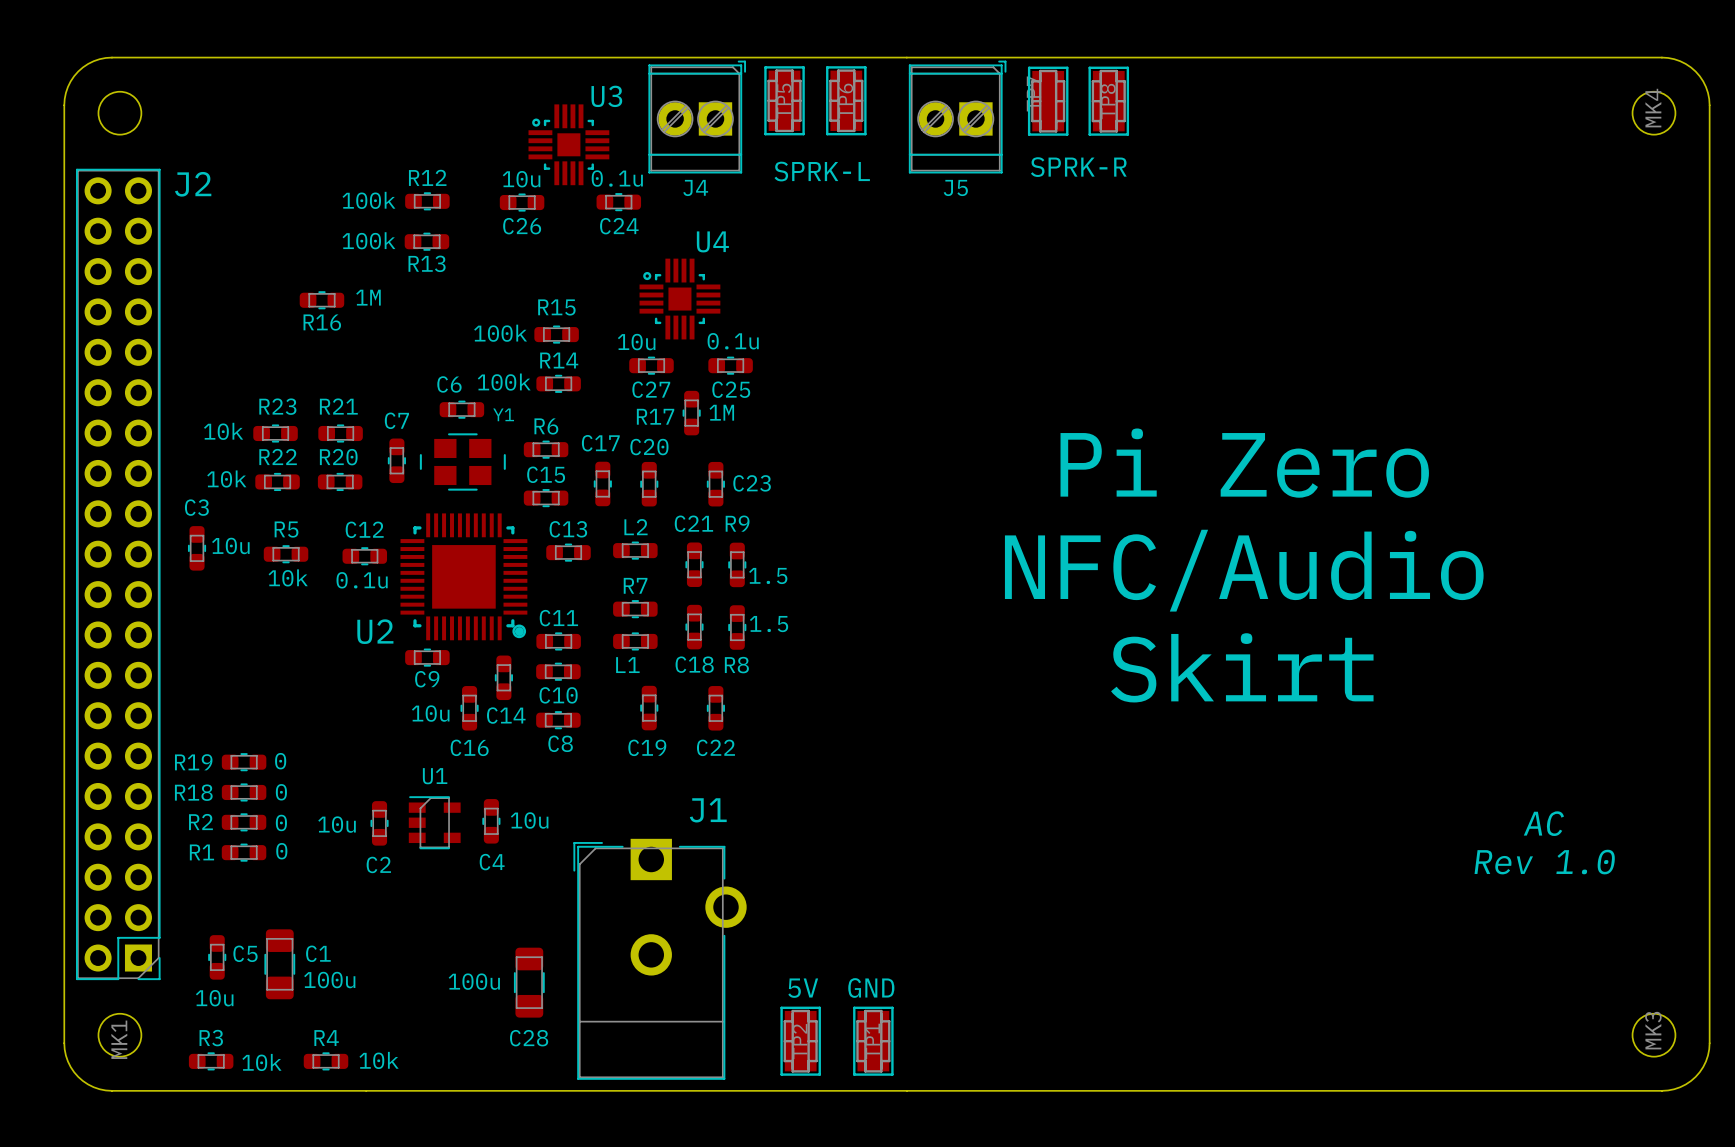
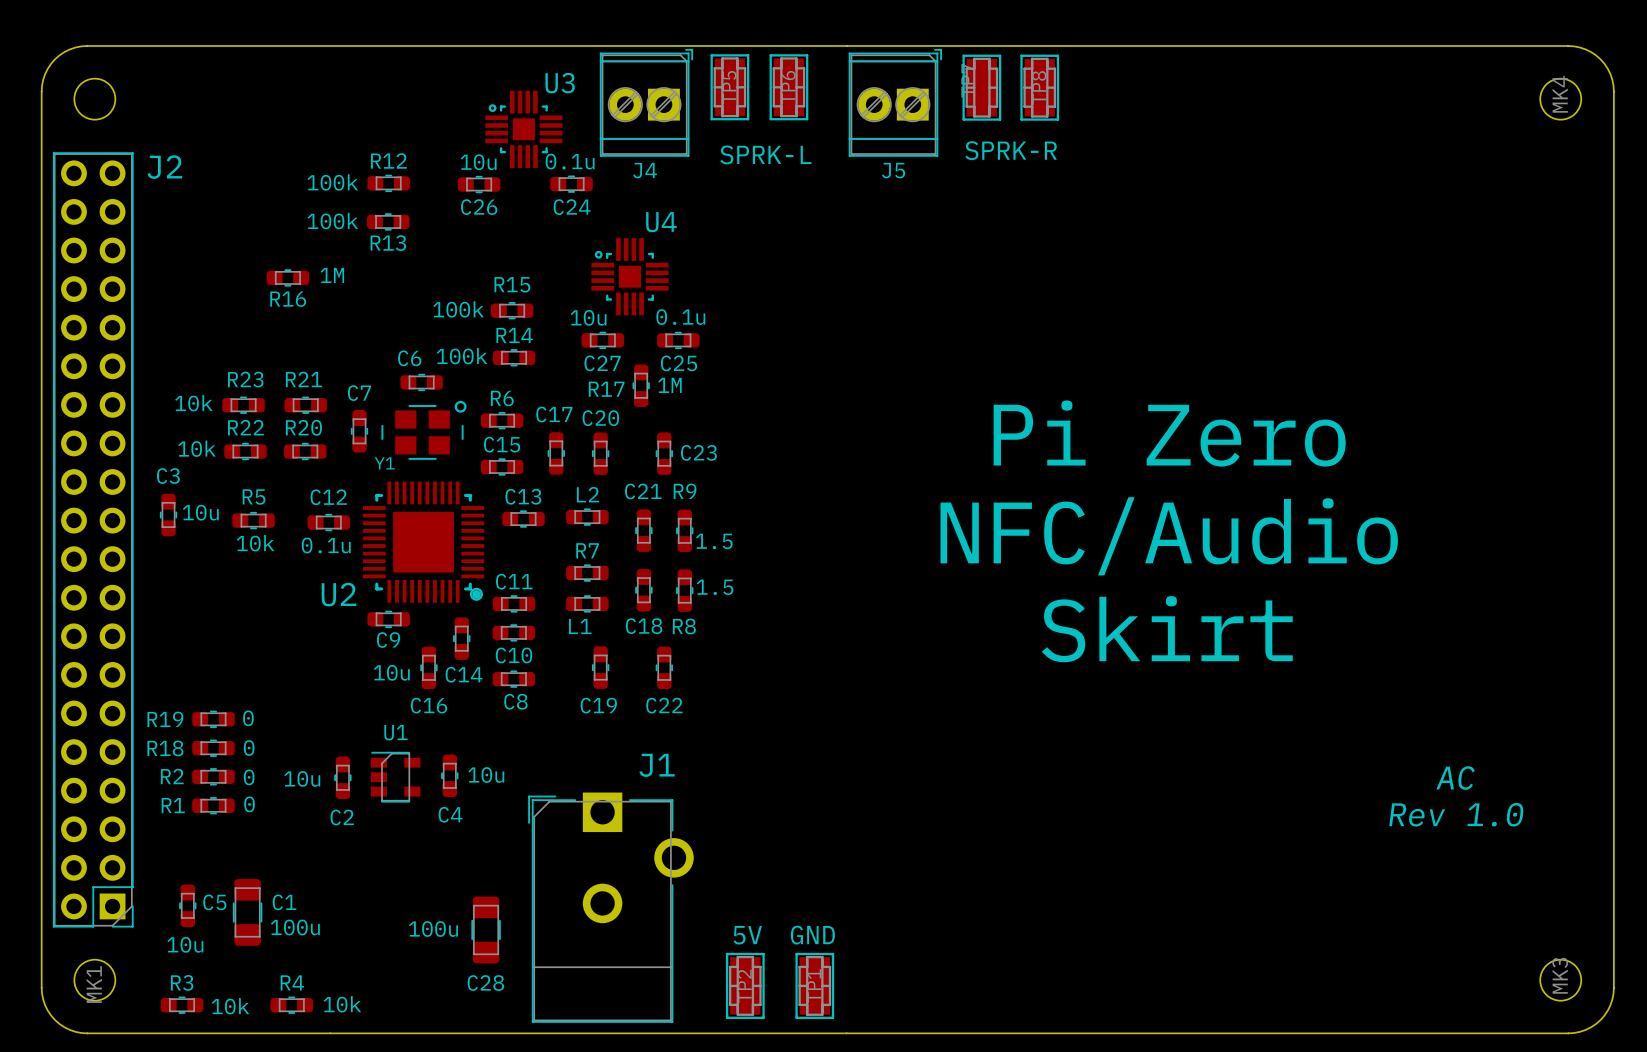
Y1 name position: Y1 (503, 414) -> Y1 (384, 463)
drawing: none -> [454, 400, 467, 413]

